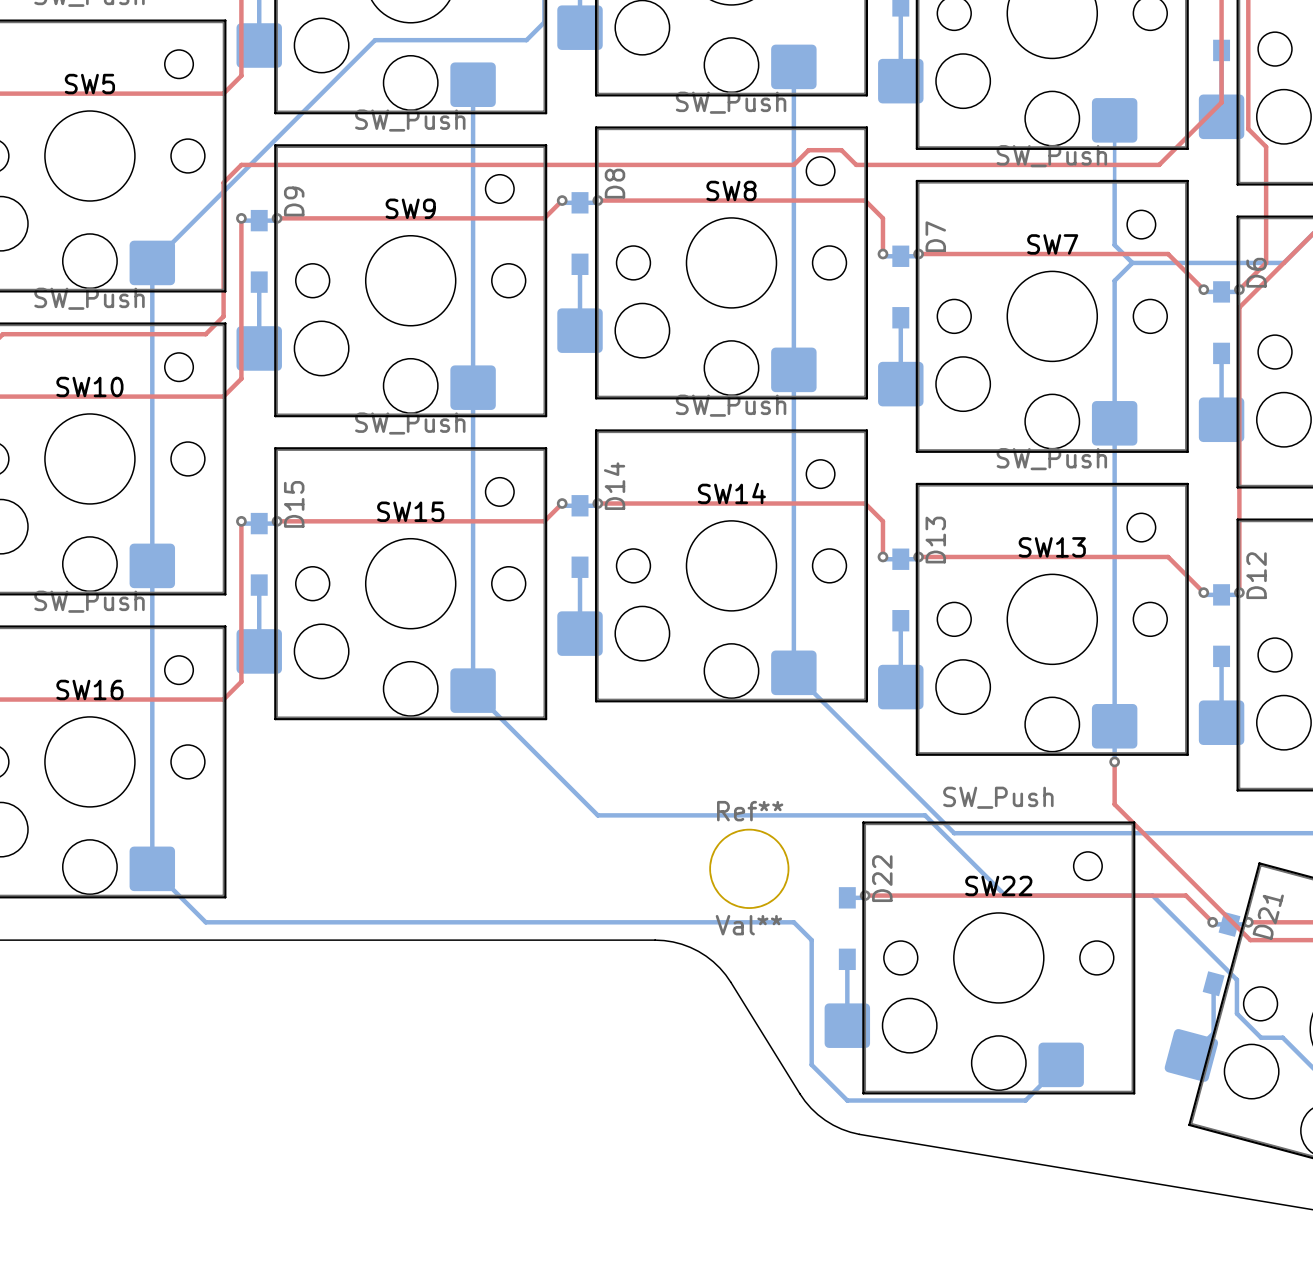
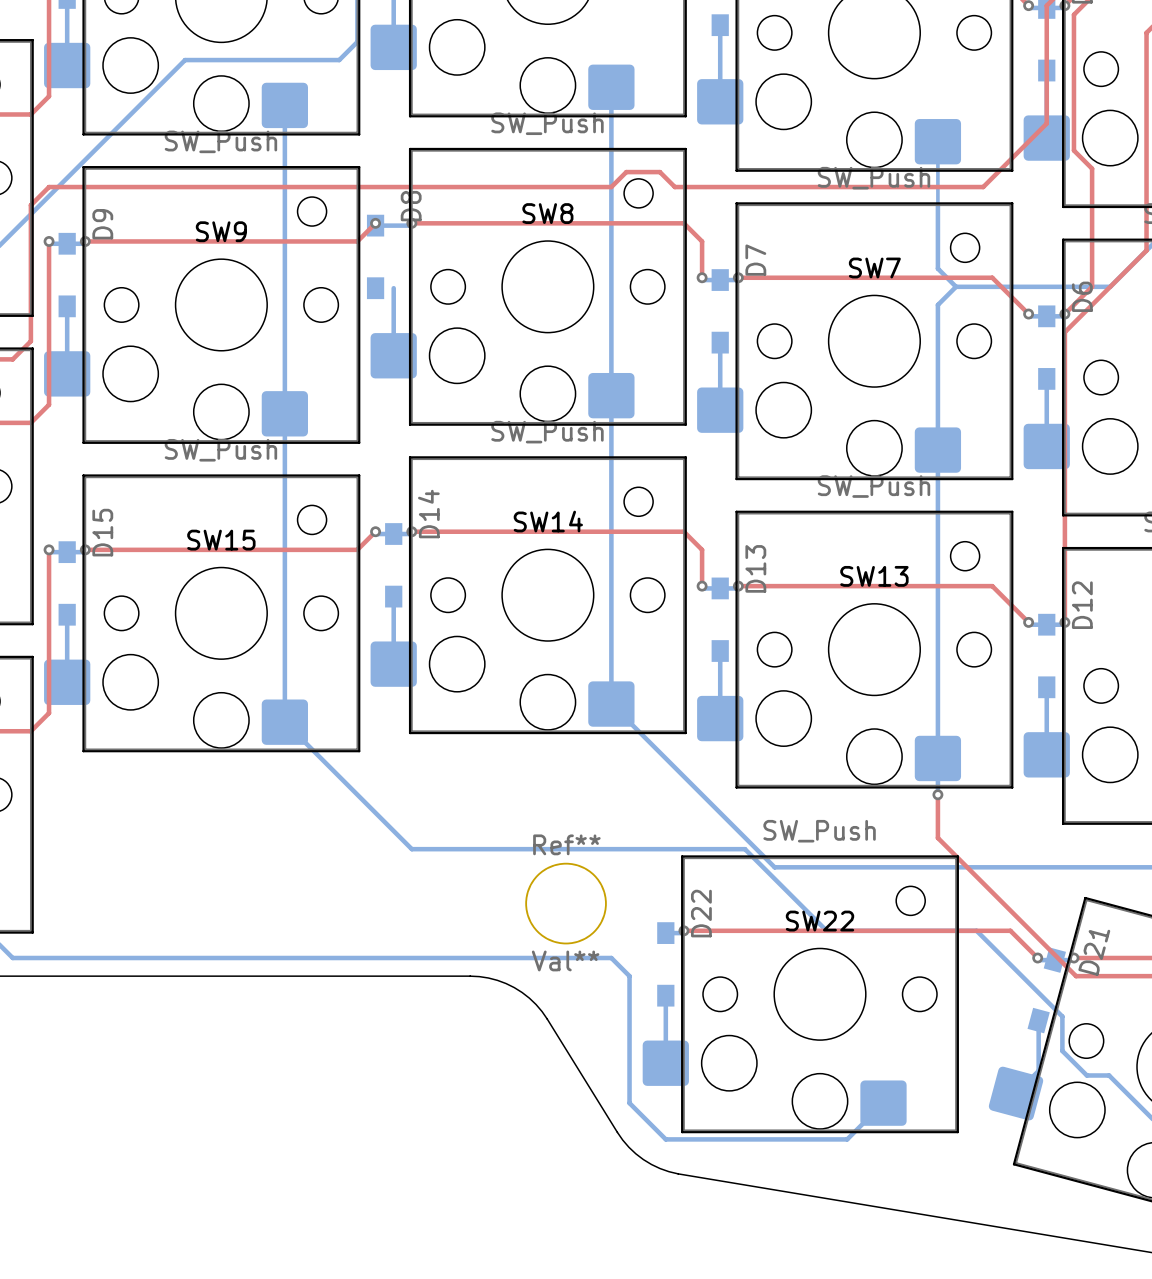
D8 position: (580, 233) -> (375, 256)

